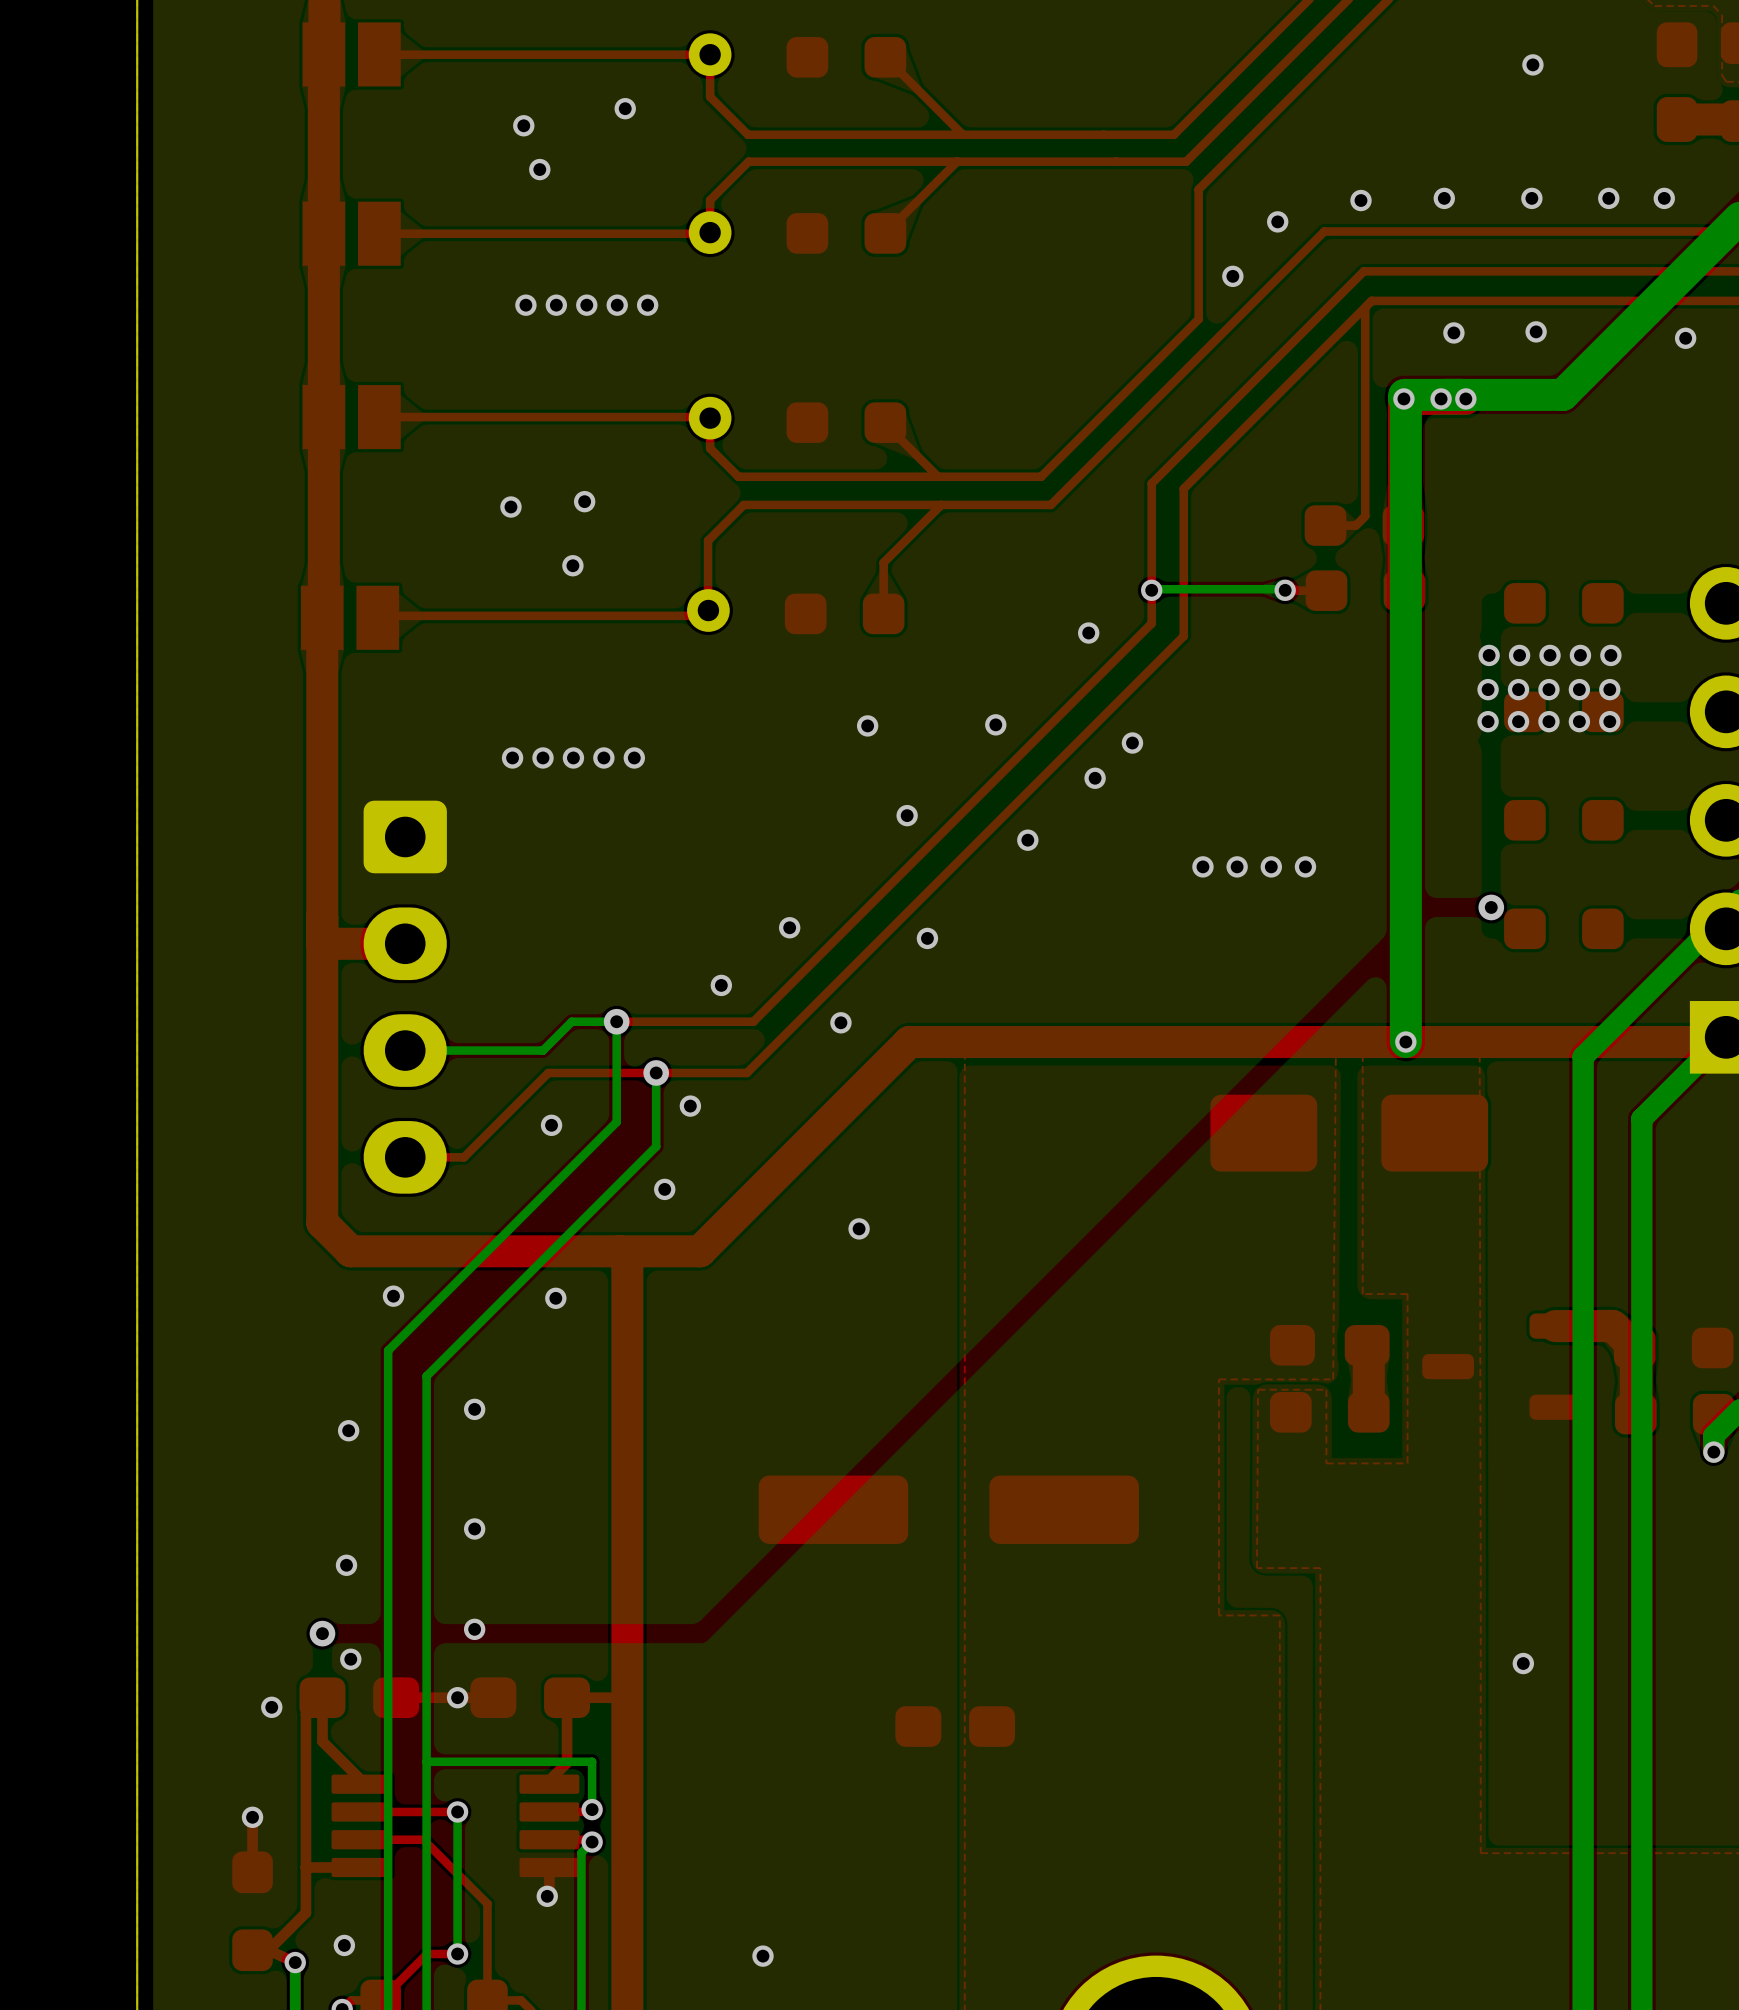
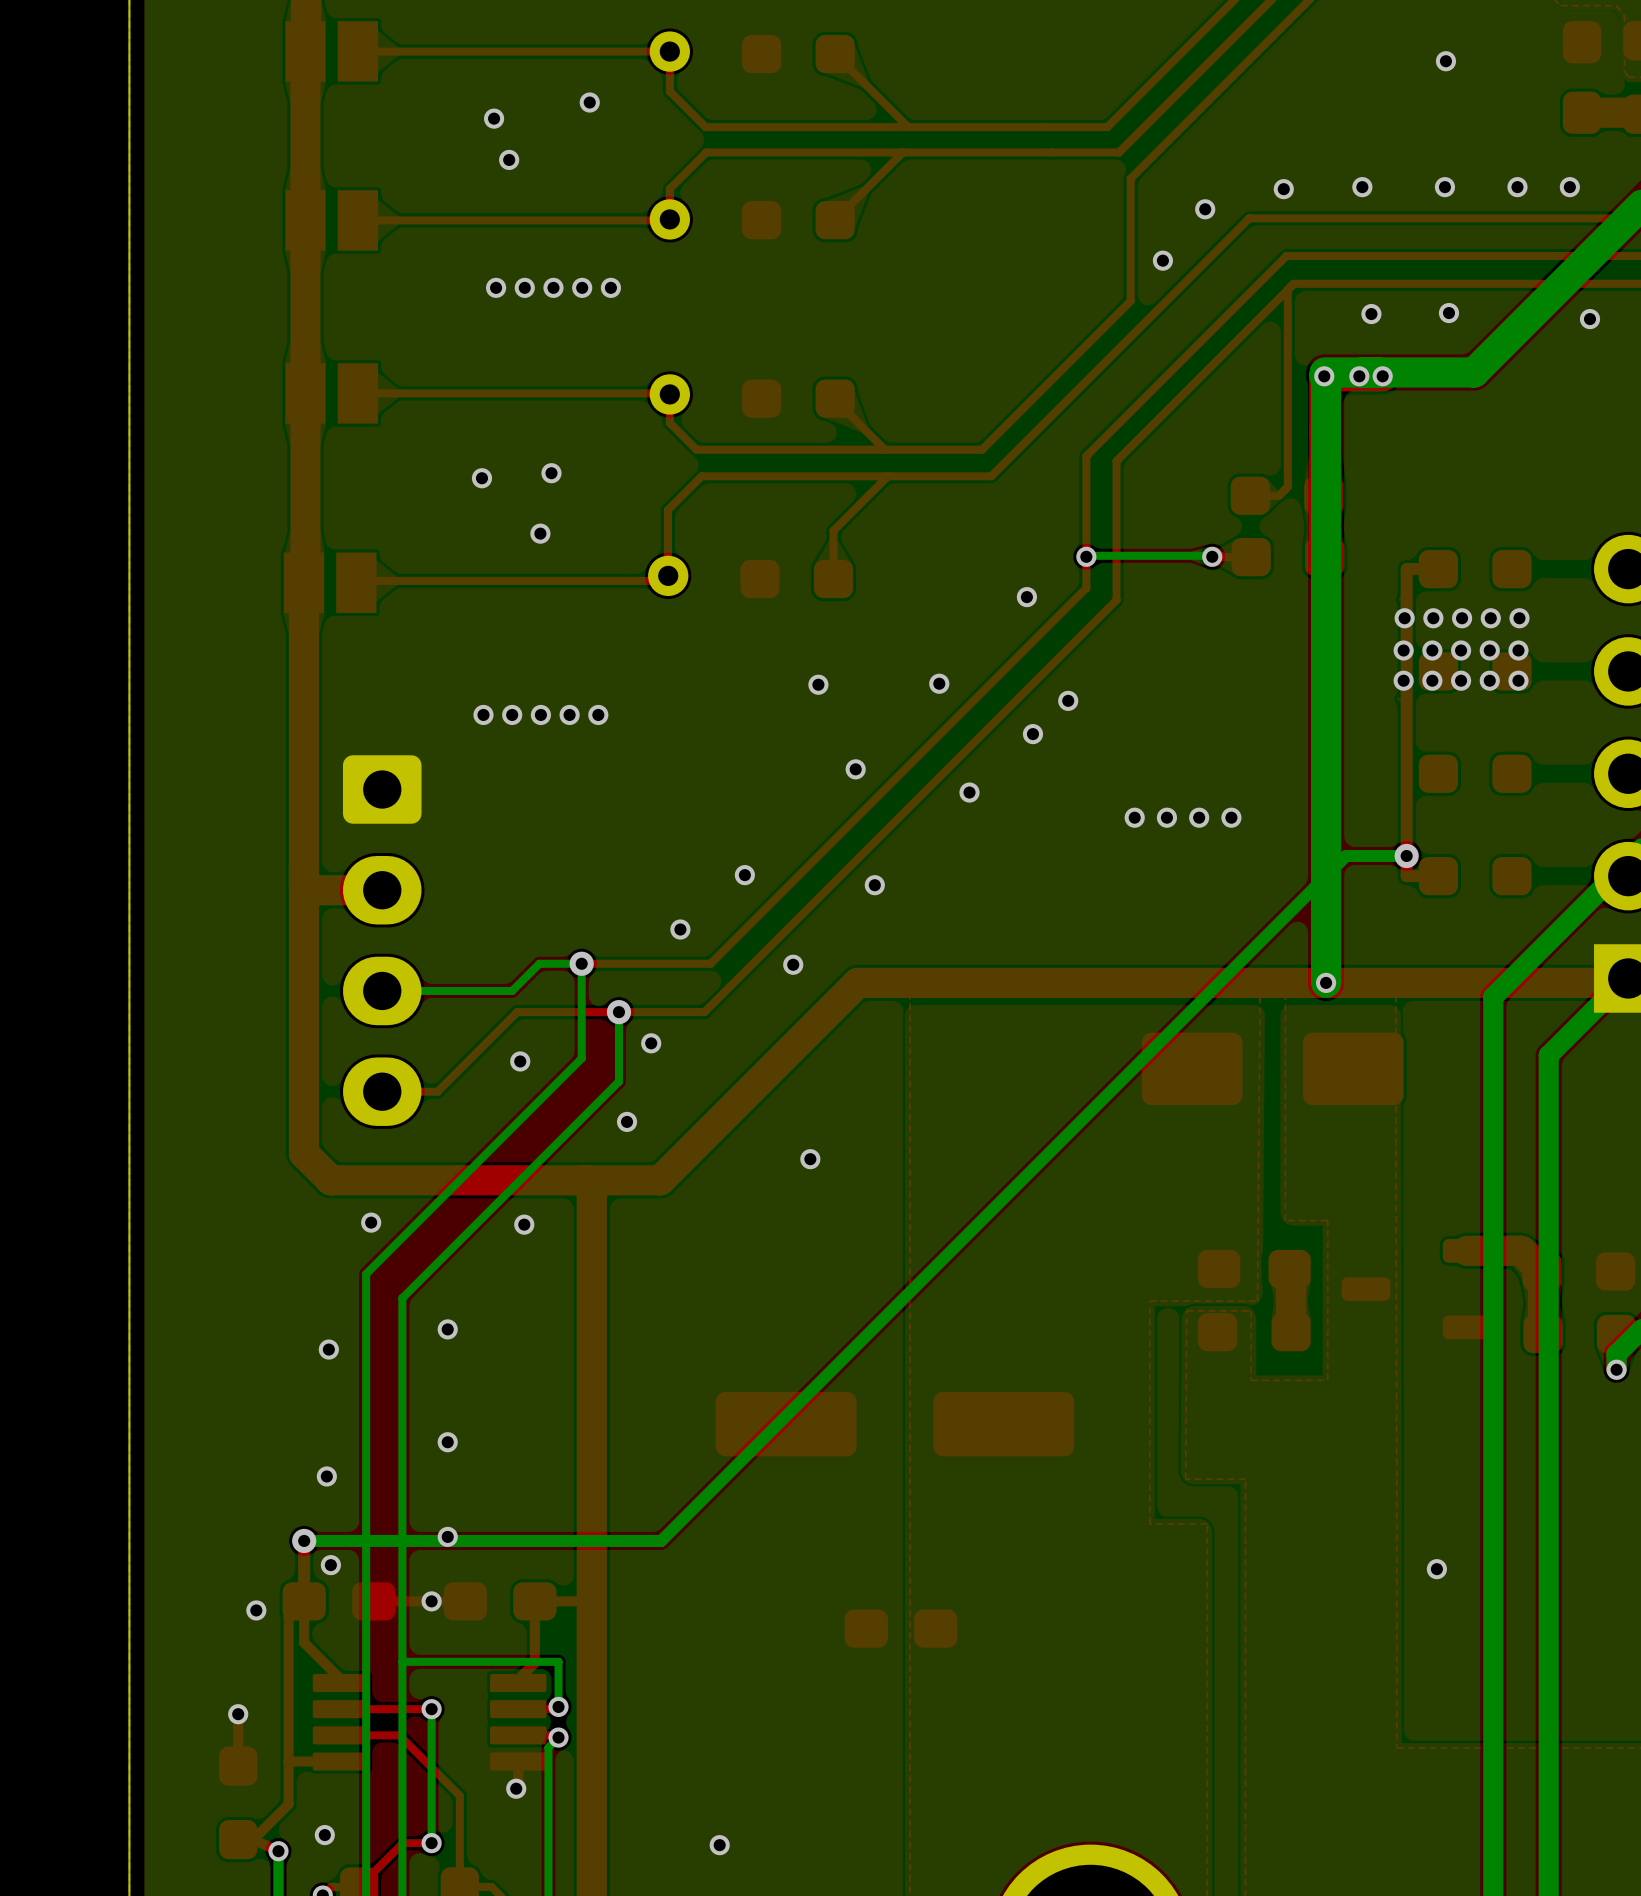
top track: none -> (1438, 569) (1406, 569) (1406, 876) (1438, 876)
bottom track: none -> (1406, 855) (1346, 855) (661, 1540) (304, 1540)
top track: none -> (304, 1540) (304, 1601)

